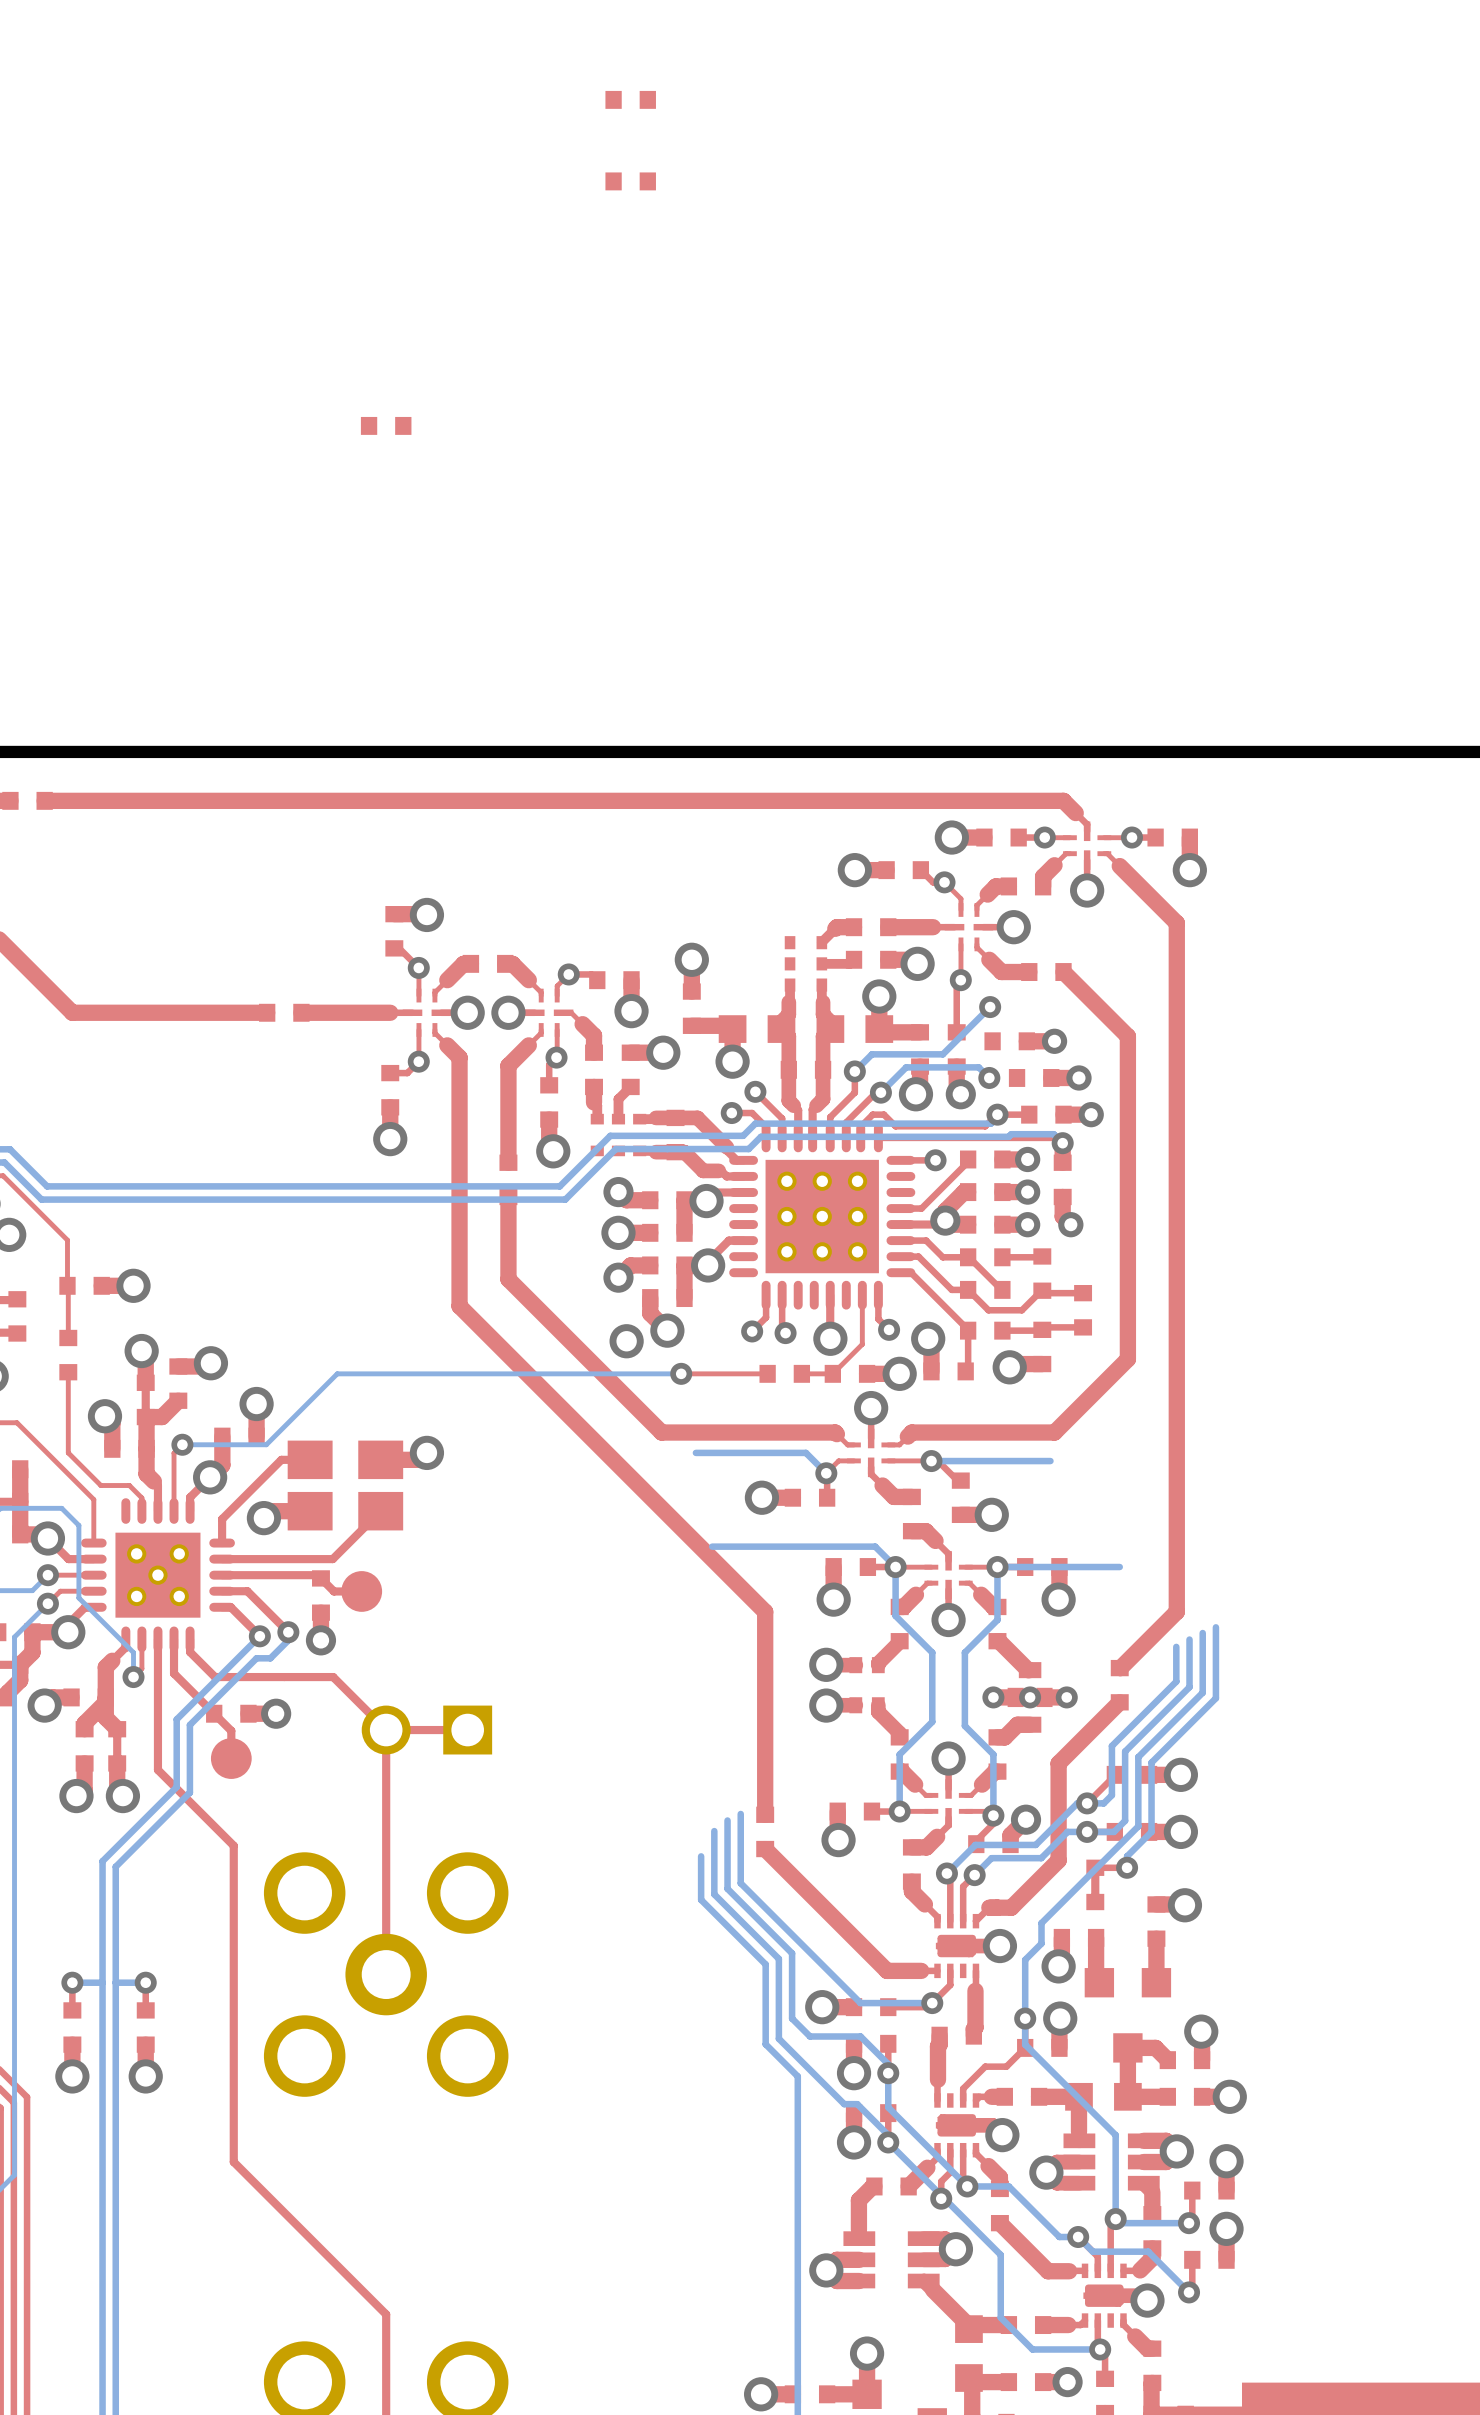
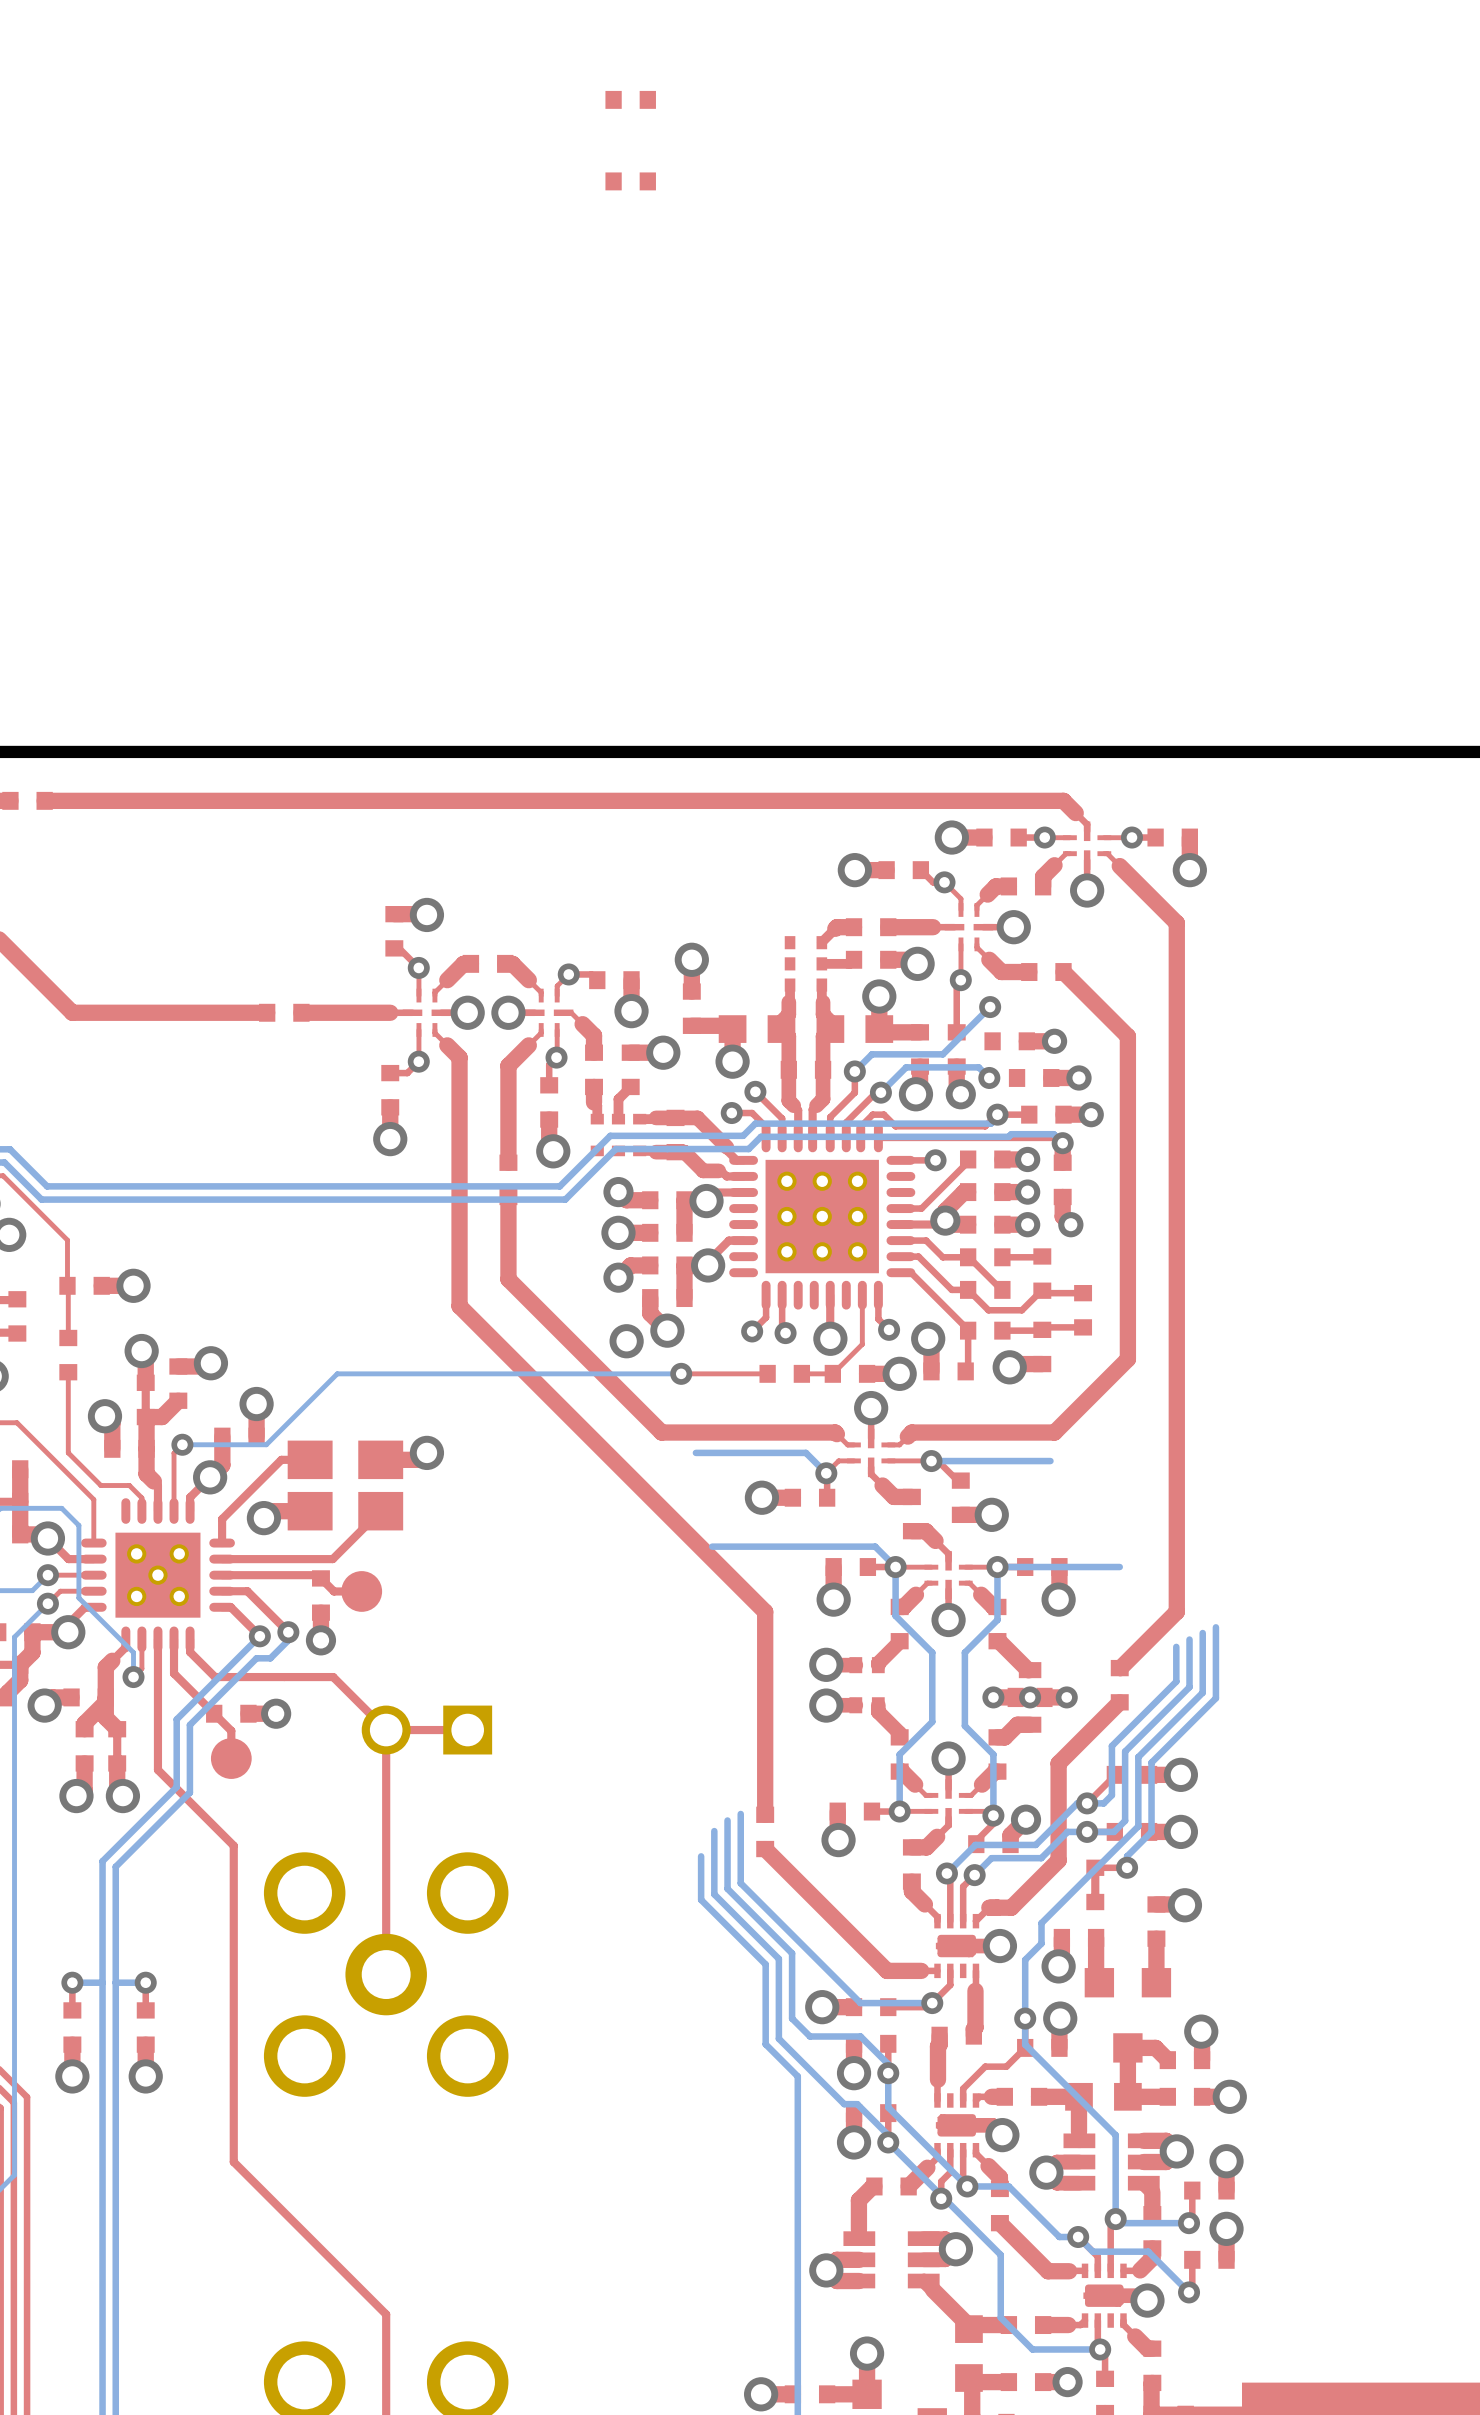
part: (386, 425) -> none

